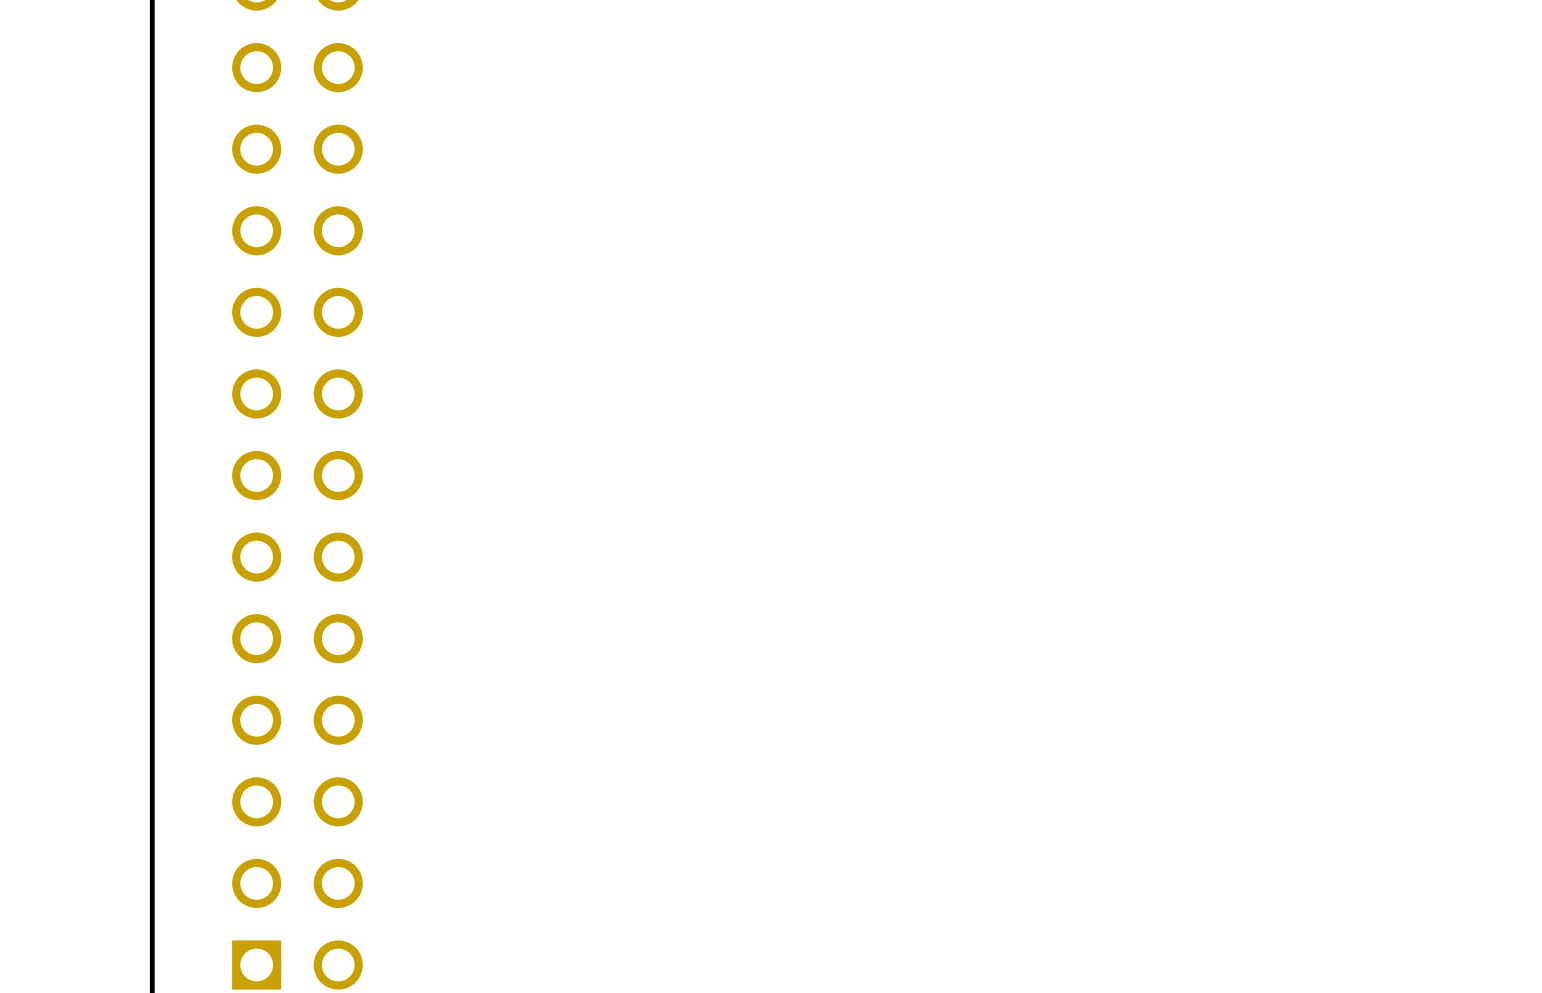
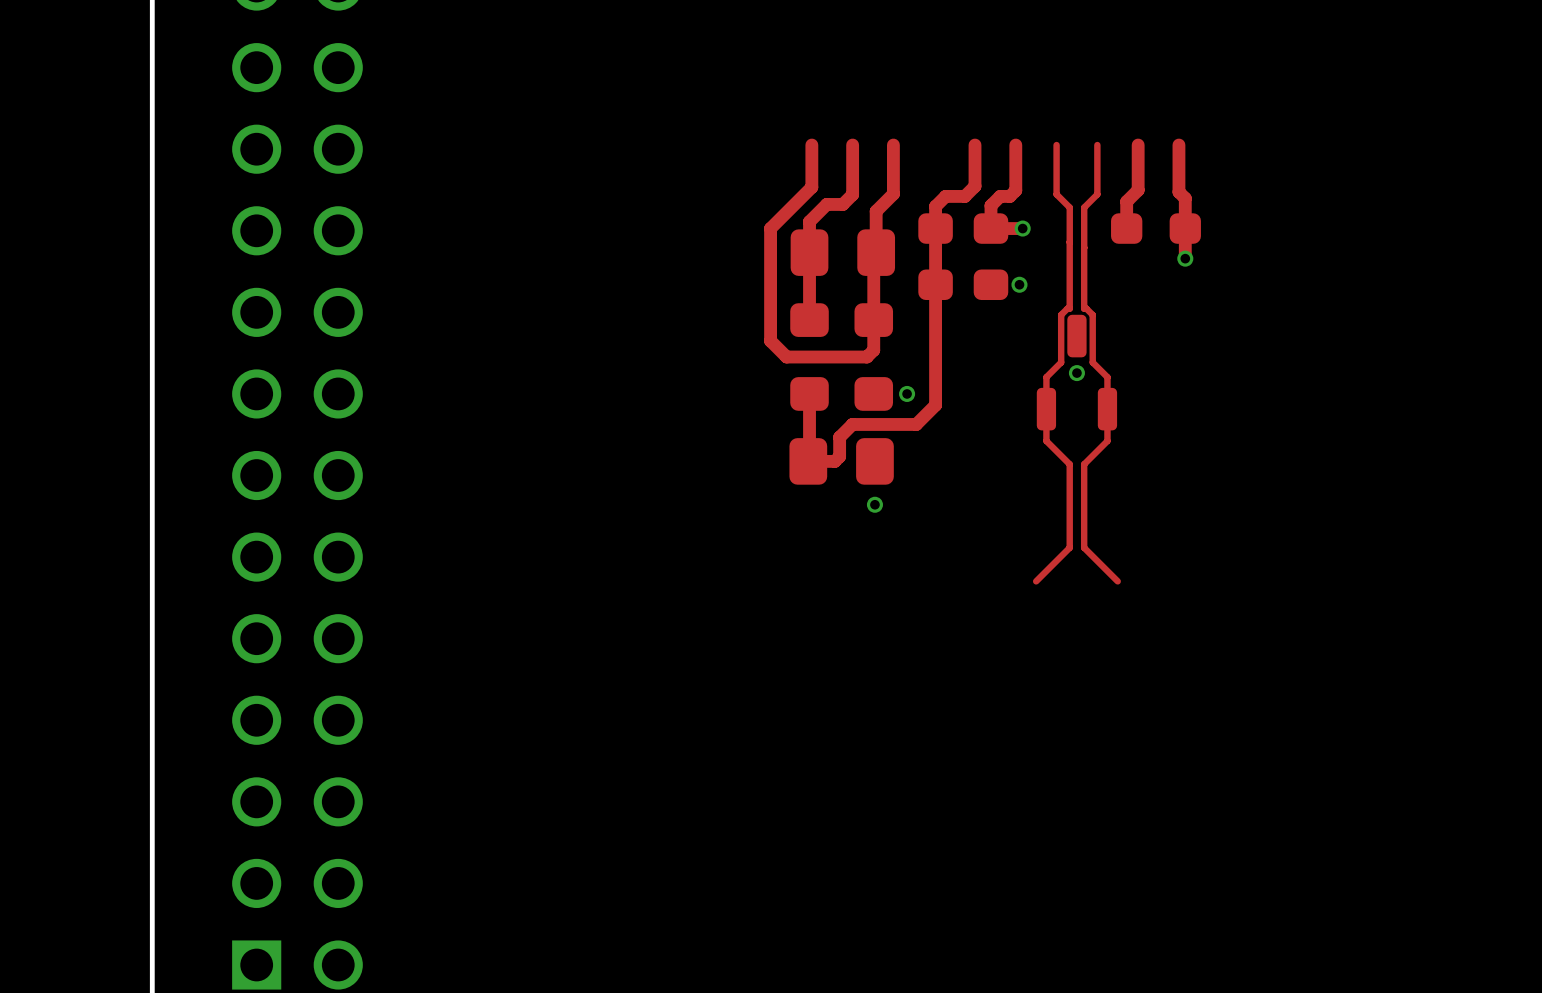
top track: none -> (852, 145) (852, 194) (842, 204) (826, 204) (809, 221) (809, 320)
top track: none -> (893, 145) (893, 194) (876, 211) (876, 252) (873, 255) (873, 350) (866, 357) (786, 357) (770, 340) (770, 228) (811, 187) (811, 145)
top track: none -> (975, 145) (975, 186) (964, 196) (945, 196) (935, 206) (935, 405) (916, 424) (852, 424) (839, 437) (839, 456) (834, 461) (808, 461) (809, 393)
top track: none -> (1015, 145) (1015, 190) (1009, 196) (1000, 196) (990, 205) (990, 228) (1022, 228)
top track: none -> (1056, 145) (1056, 194) (1069, 207) (1069, 308) (1061, 314) (1061, 362) (1046, 377) (1046, 441) (1069, 464) (1069, 547) (1036, 581)
top track: none -> (1097, 145) (1097, 194) (1084, 207) (1084, 308) (1092, 314) (1092, 362) (1107, 377) (1107, 441) (1084, 464) (1084, 547) (1117, 581)
top track: none -> (1138, 145) (1138, 190) (1126, 201) (1126, 228)
top track: none -> (1178, 145) (1178, 192) (1185, 198) (1185, 258)
part: none -> (963, 228)
via: none -> (1022, 228)
part: none -> (1155, 228)
part: none -> (842, 252)
via: none -> (1185, 258)
part: none -> (963, 284)
via: none -> (1019, 284)
part: none -> (809, 357)
part: none -> (873, 357)
part: none -> (1076, 372)
via: none -> (1076, 373)
via: none -> (907, 393)
part: none -> (841, 461)
via: none -> (874, 504)

